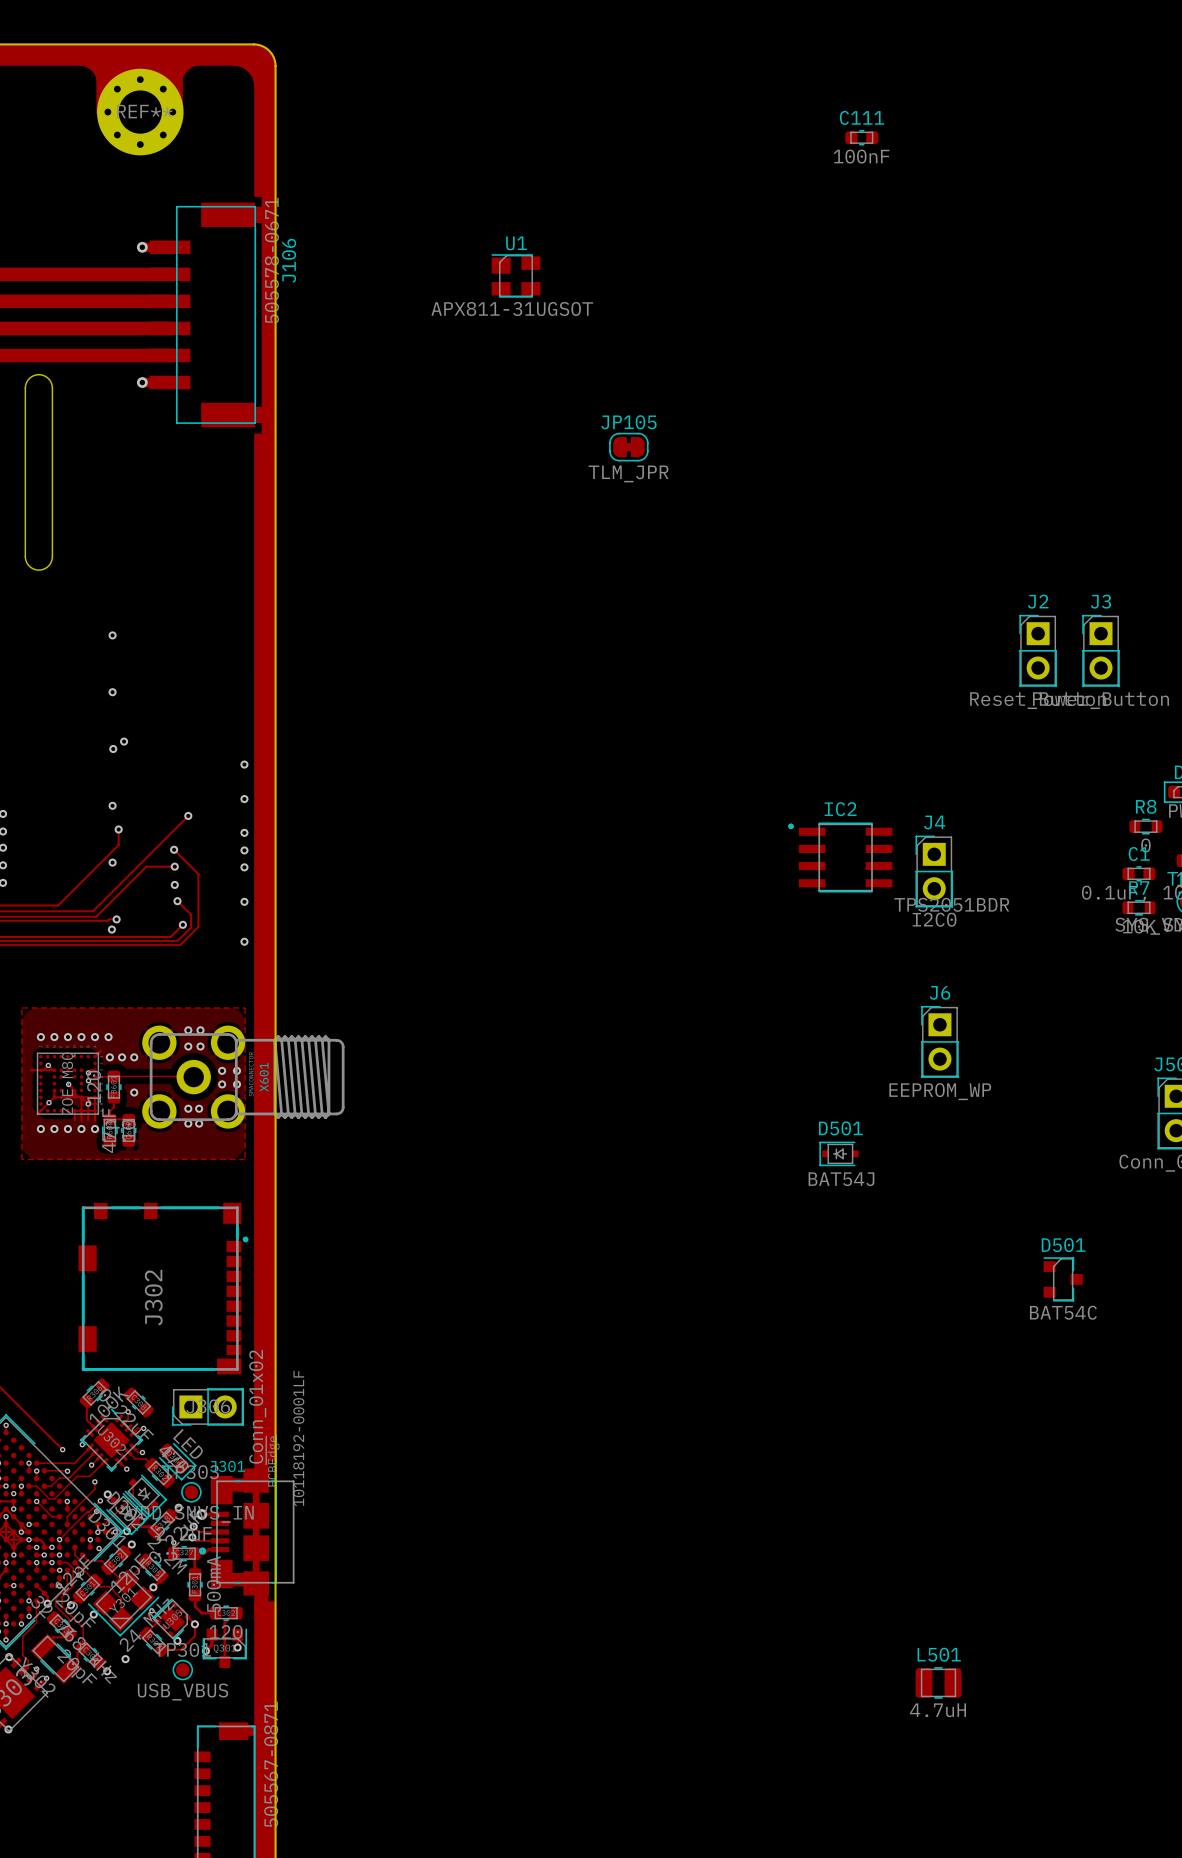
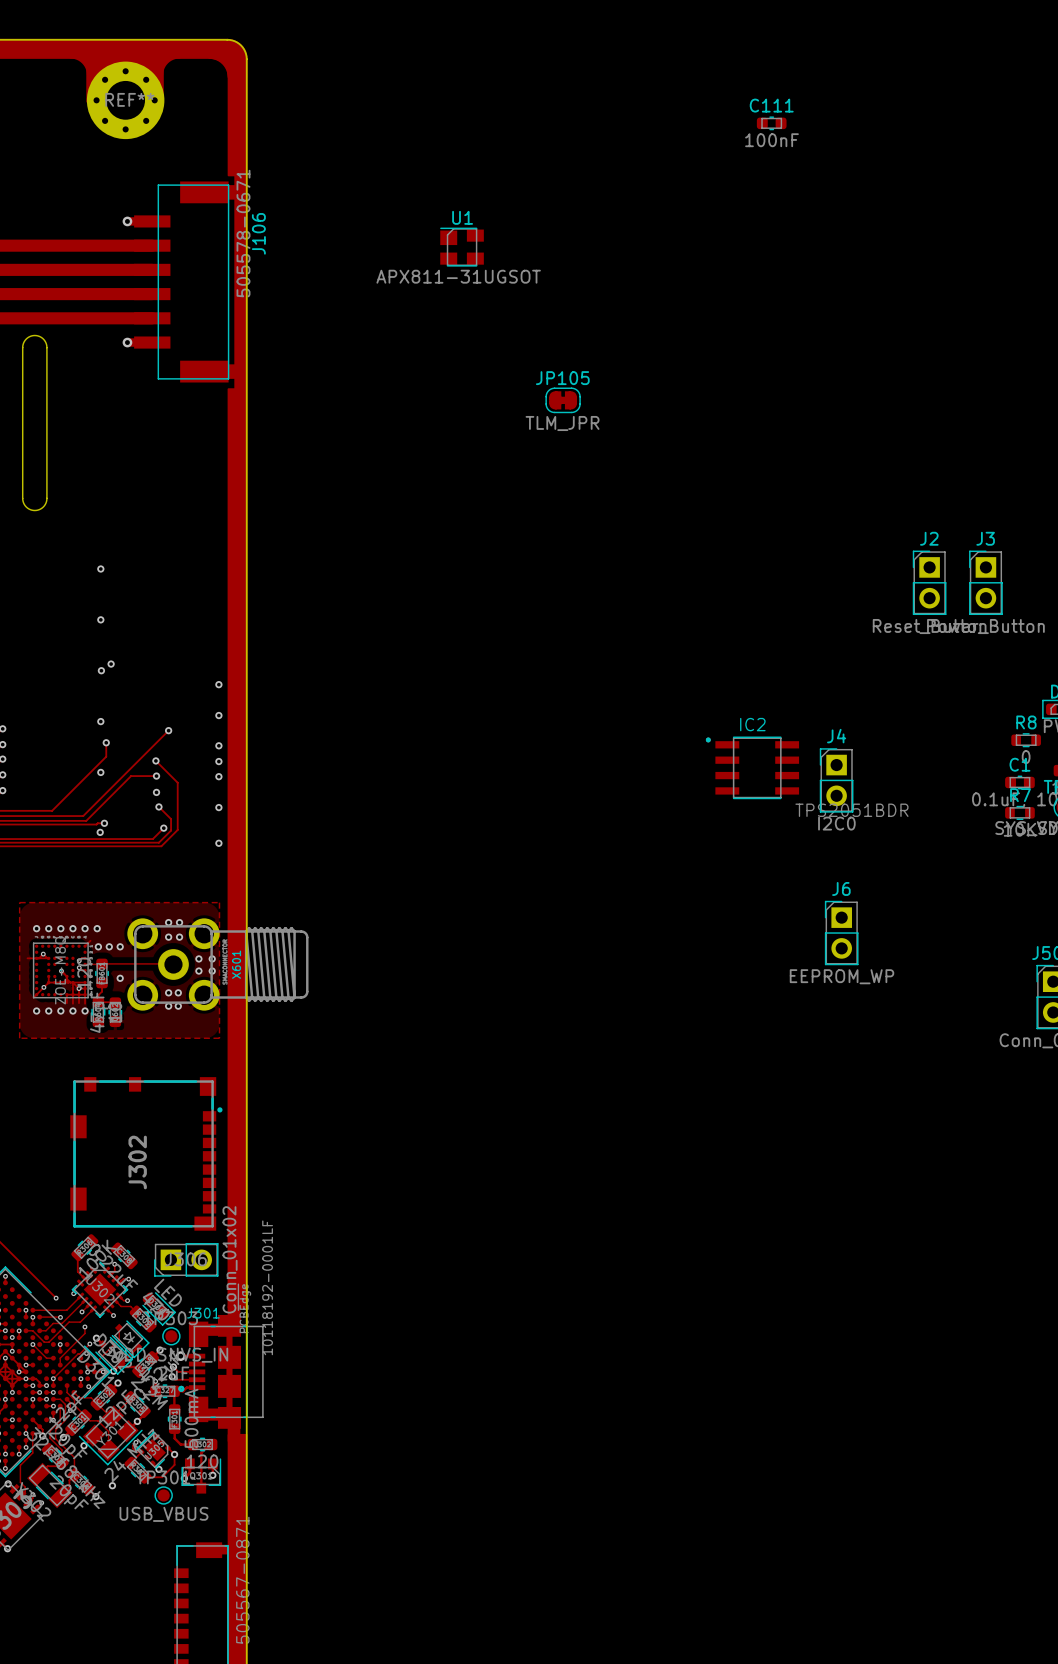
D501: BAT54J (839, 1153) -> none
D501: BAT54C (1063, 1279) -> none
L501: 4.7uH (938, 1682) -> none

